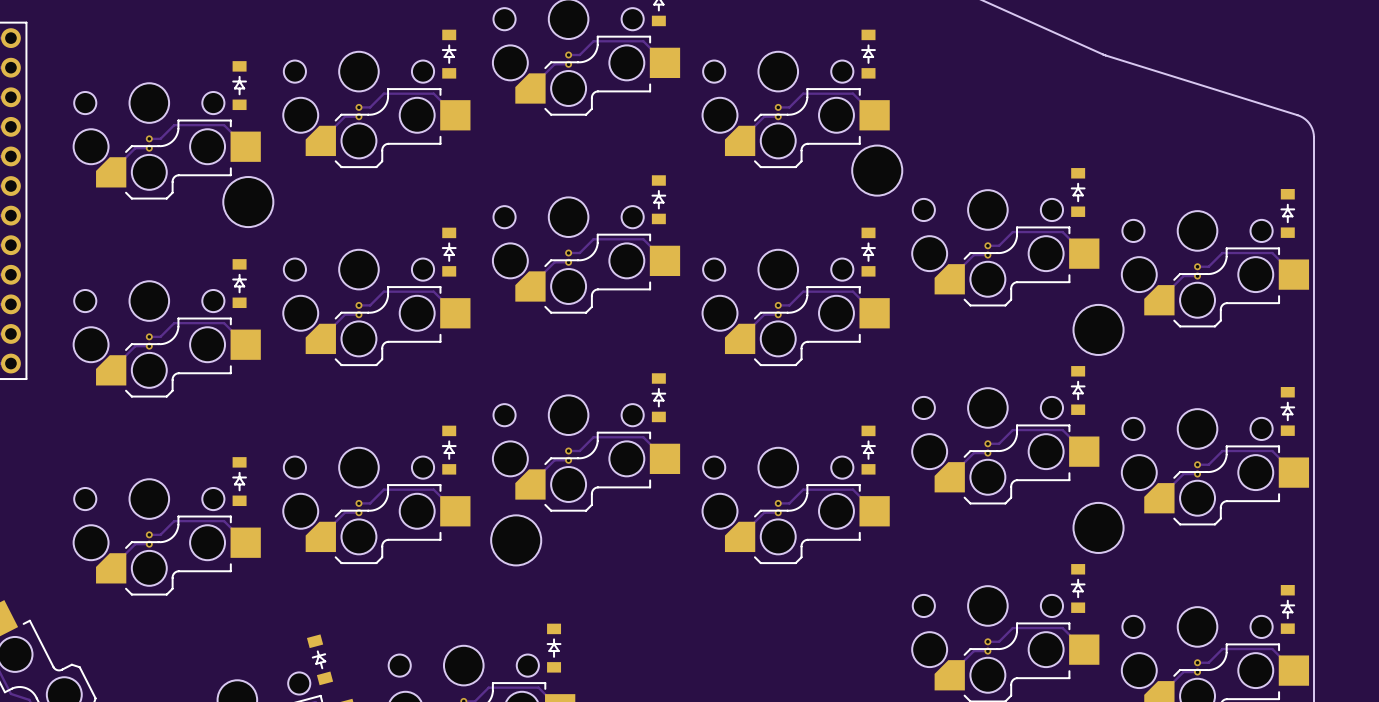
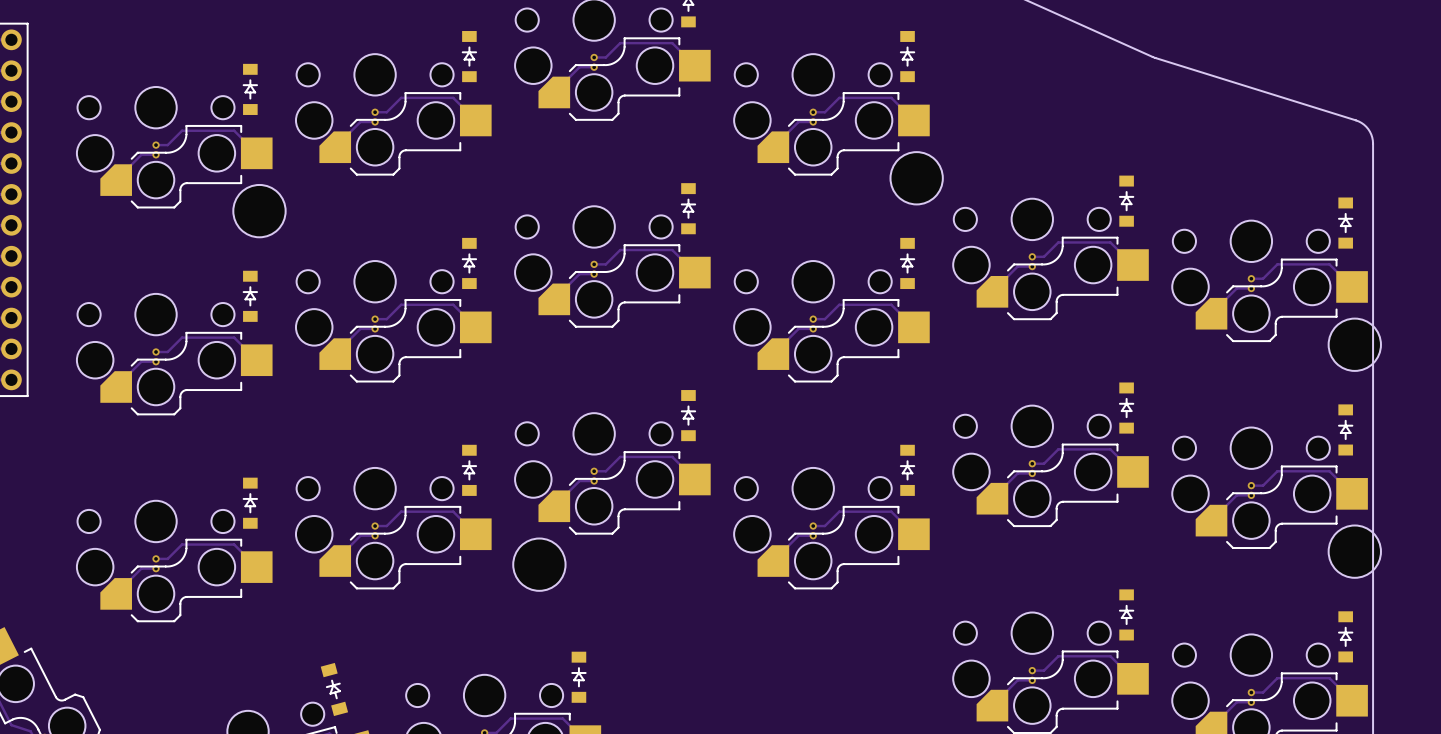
part: (1098, 329) -> none
part: none -> (1354, 344)
part: (1098, 527) -> none
part: none -> (1354, 551)

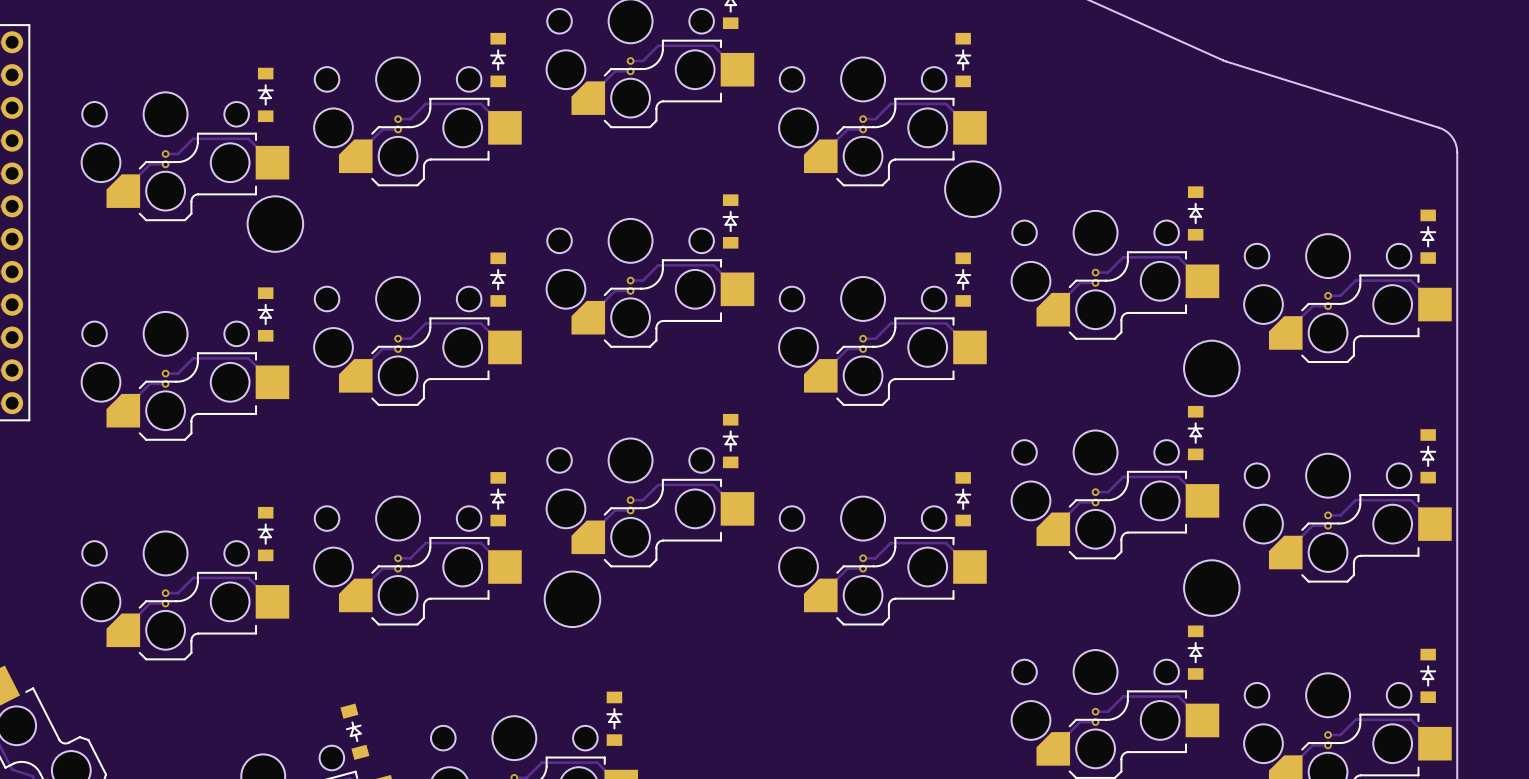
part: (1354, 344) -> none
part: none -> (1211, 368)
part: (1354, 551) -> none
part: none -> (1211, 588)

